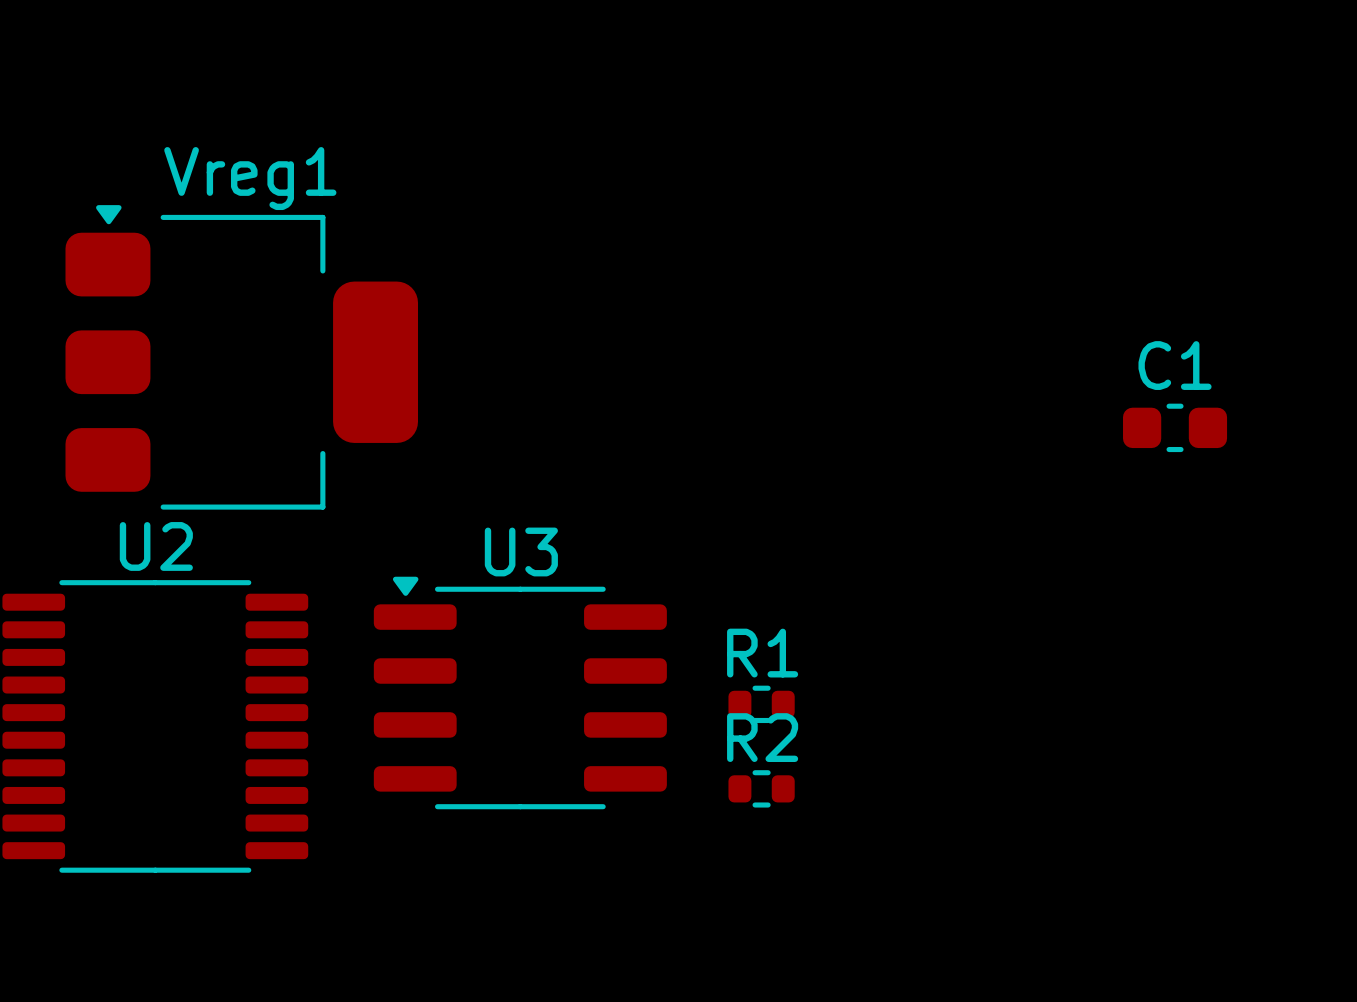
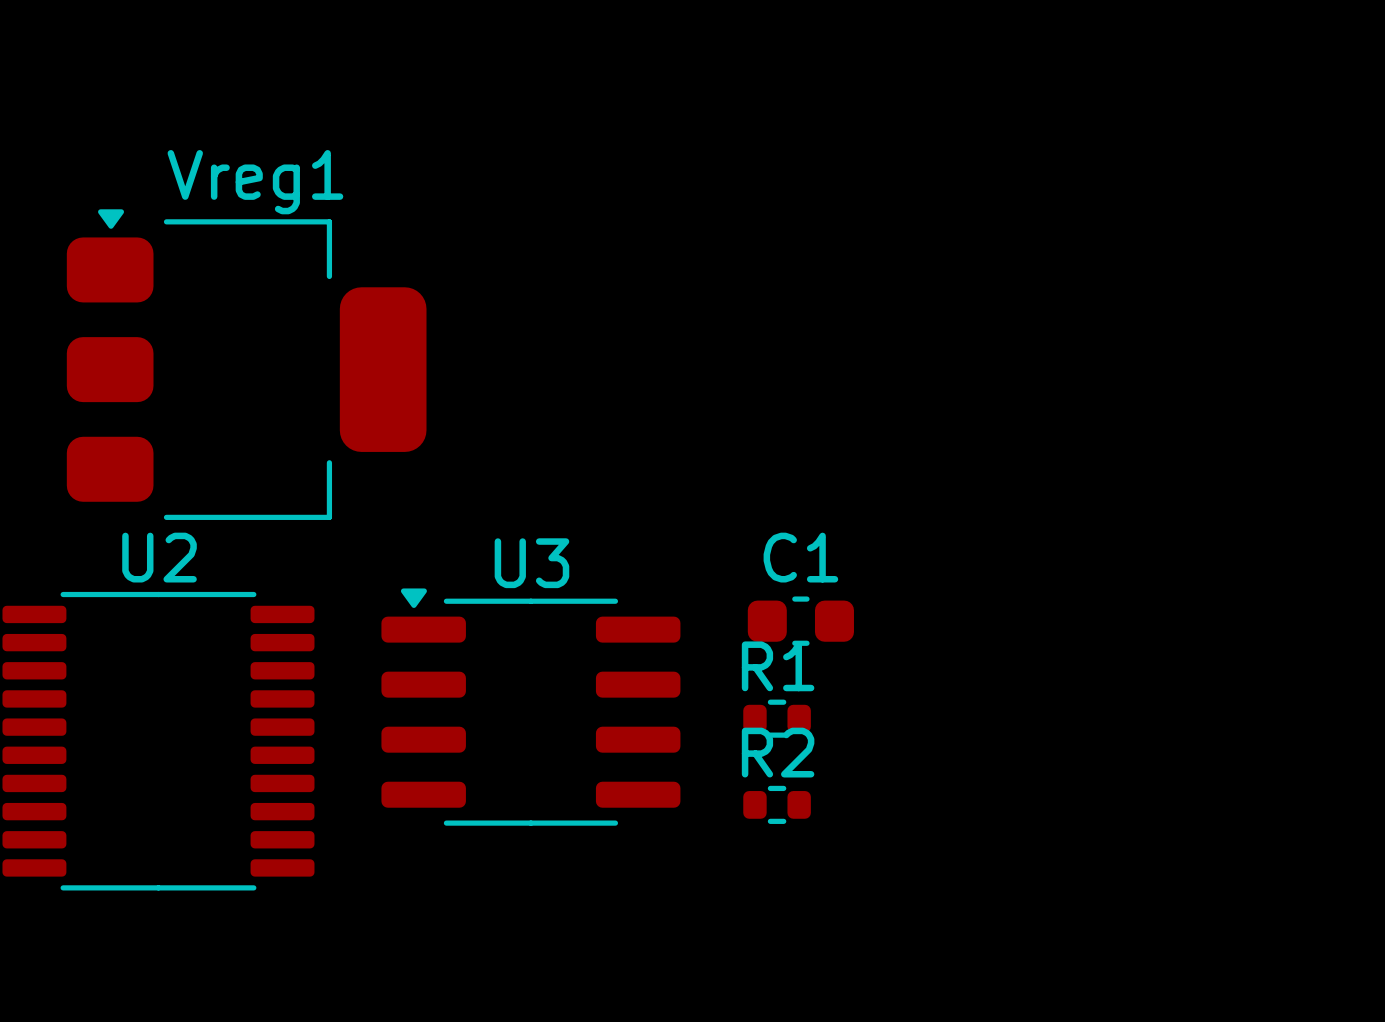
C1 position: (1175, 427) -> (800, 621)

